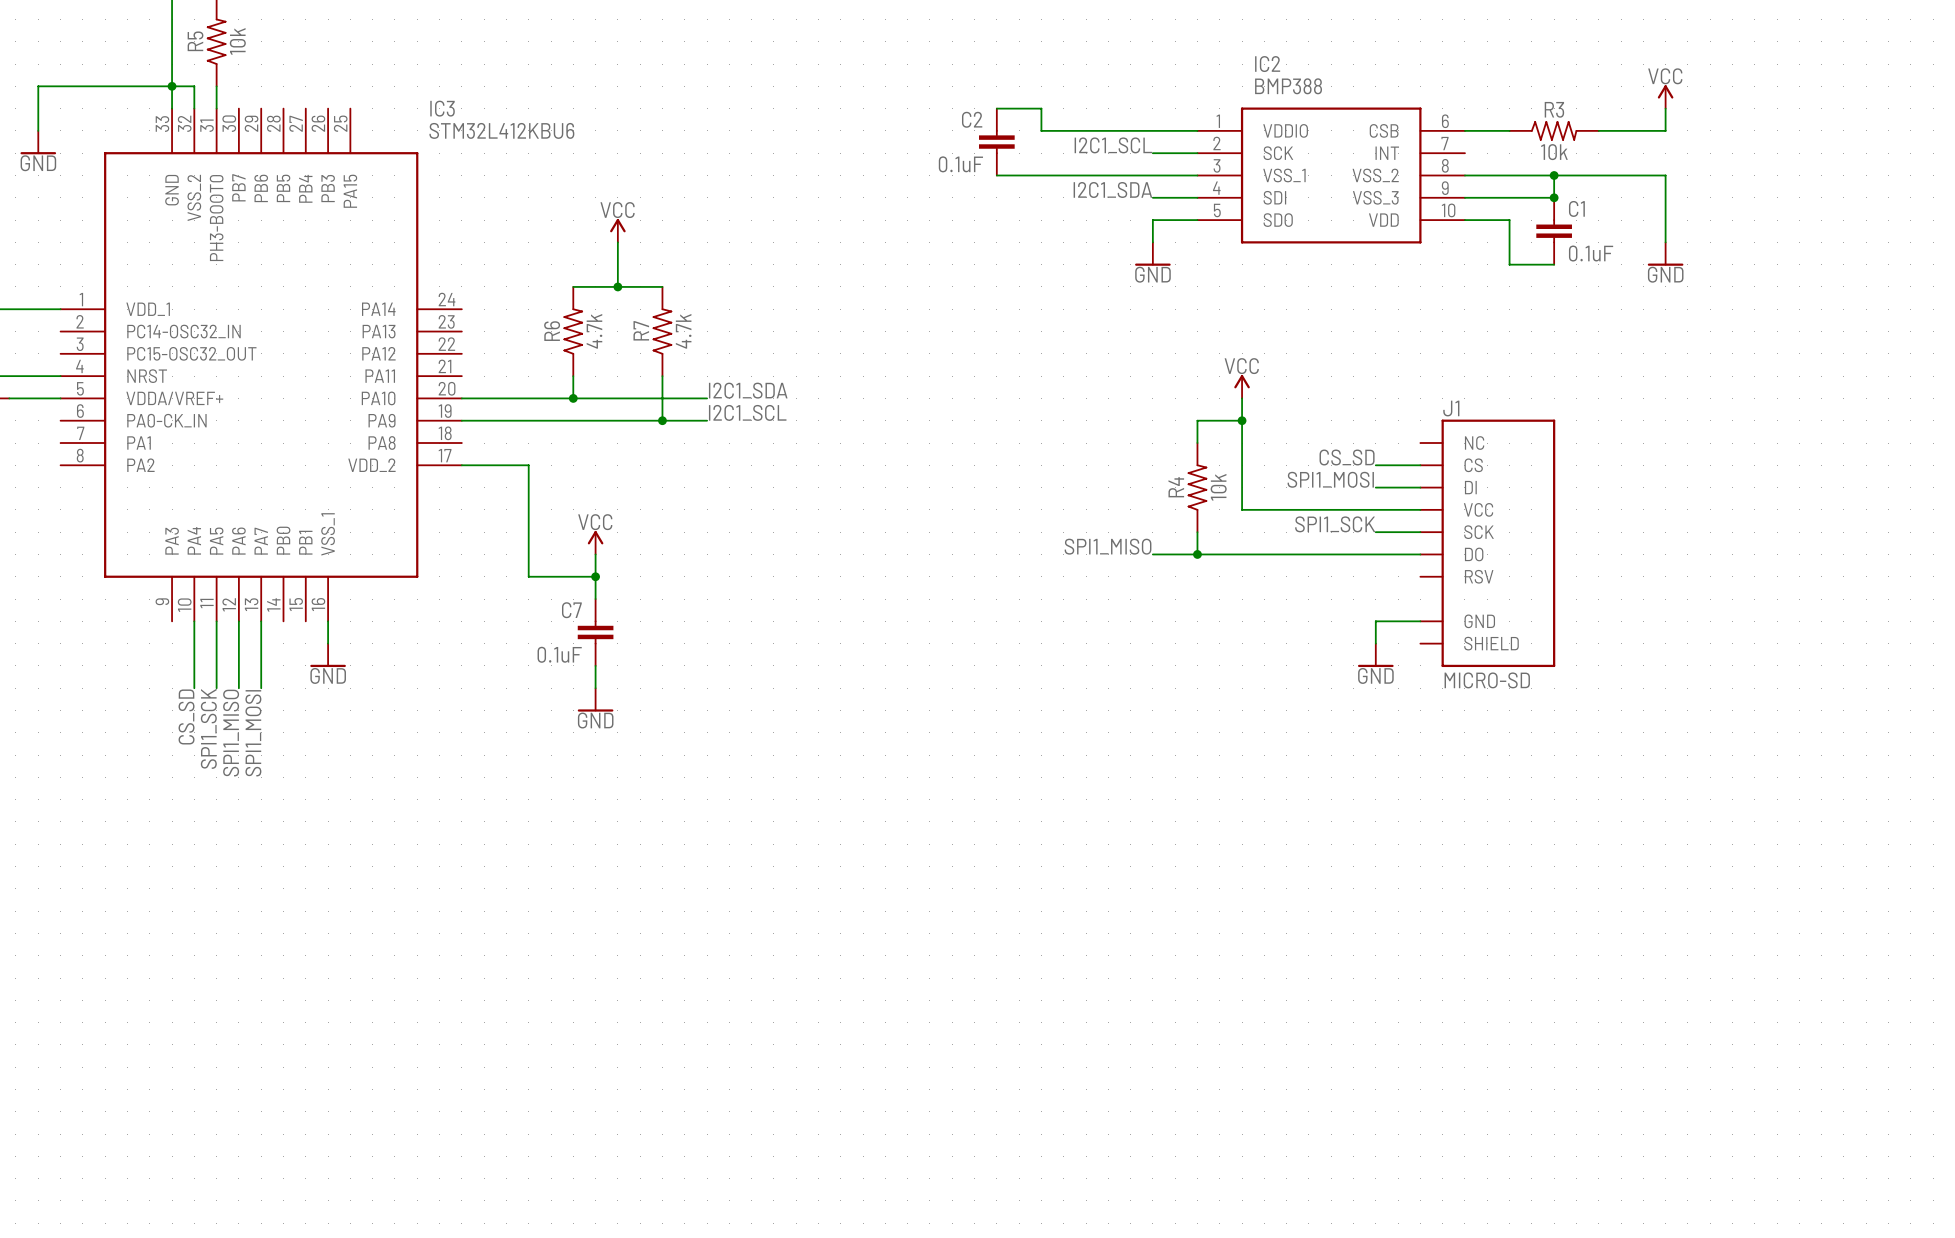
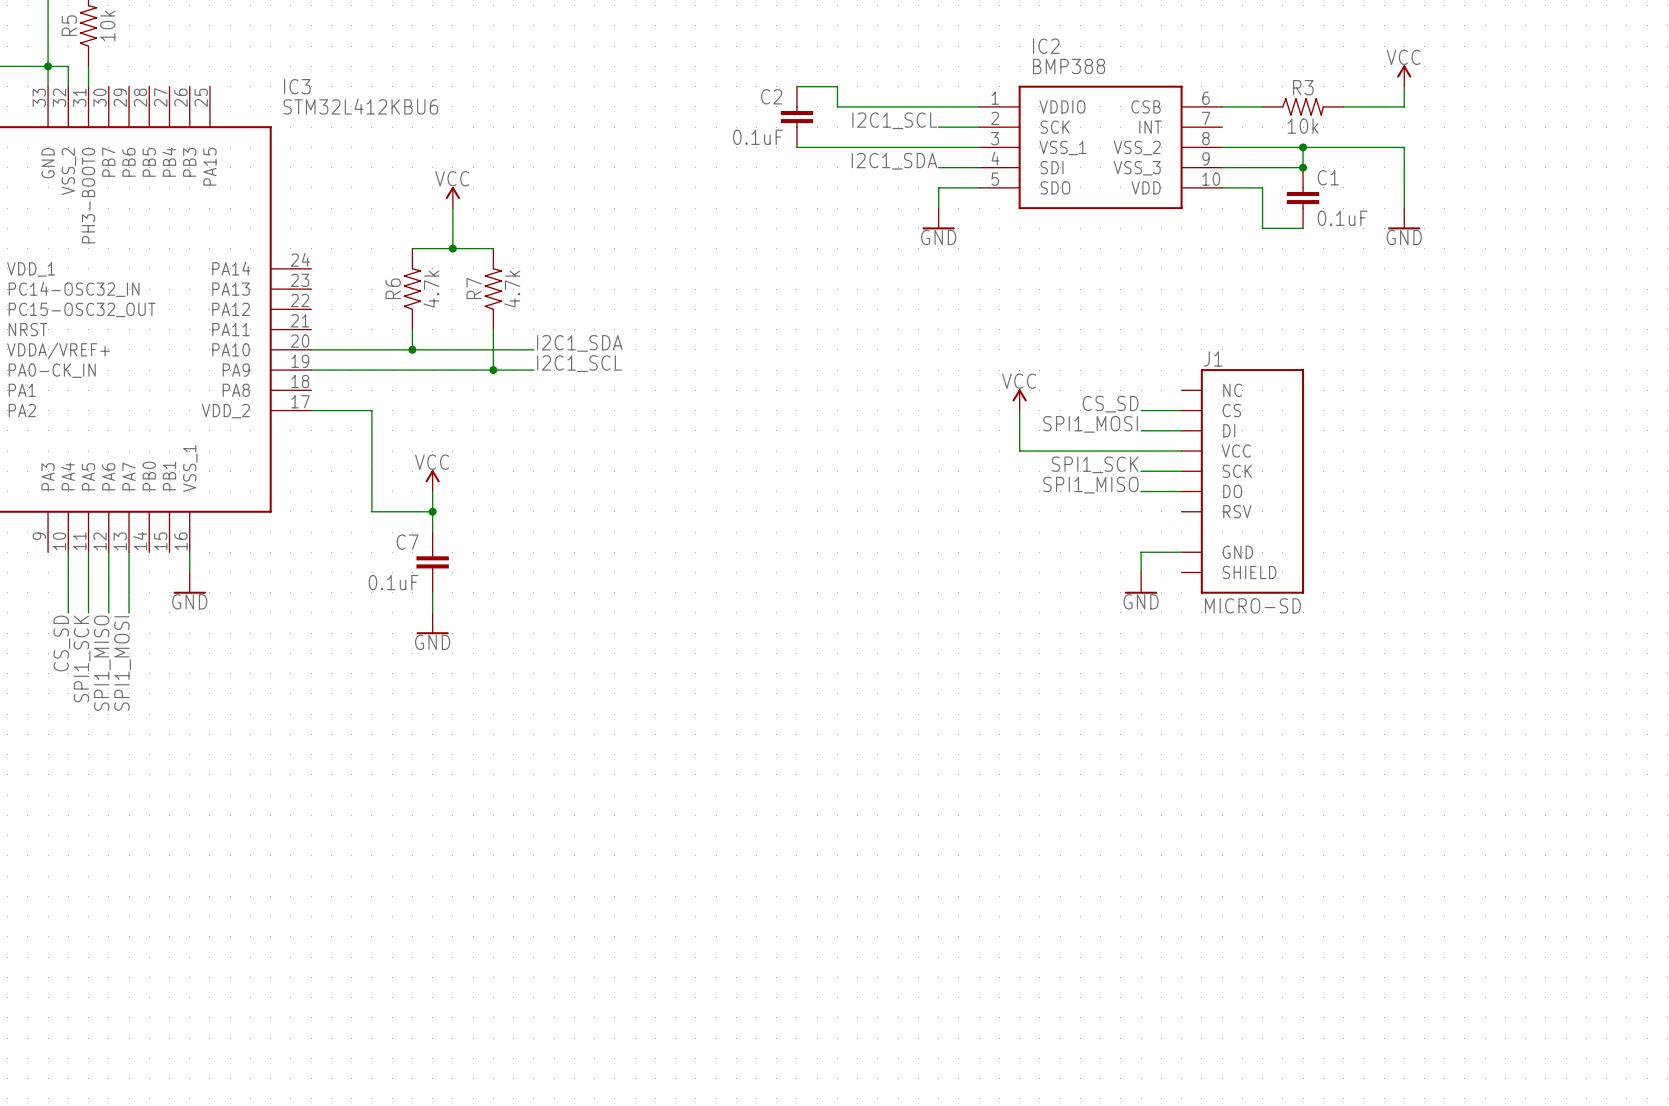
power symbol position: VCC (1242, 386) -> VCC (1019, 399)
wire: (1242, 398) (1242, 465) -> none
wire: (1242, 420) (1197, 420) (1197, 443) -> none
junction: (1242, 420) -> none
R4: 10k (1197, 487) -> none
wire: (1197, 532) (1197, 554) -> none
label: SPI1_MISO (1108, 546) -> none
label: none -> SPI1_MISO (1090, 485)
wire: (1152, 554) (1375, 554) -> none
junction: (1197, 554) -> none

